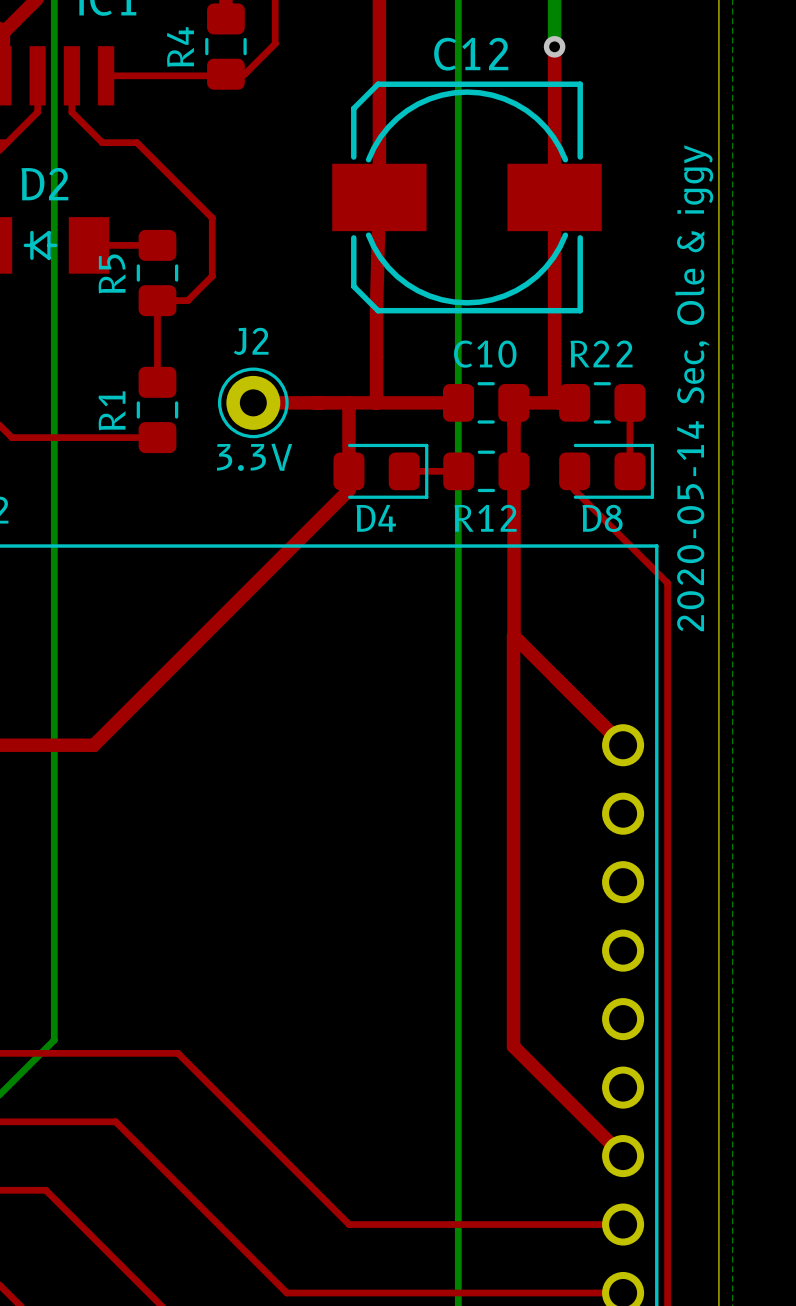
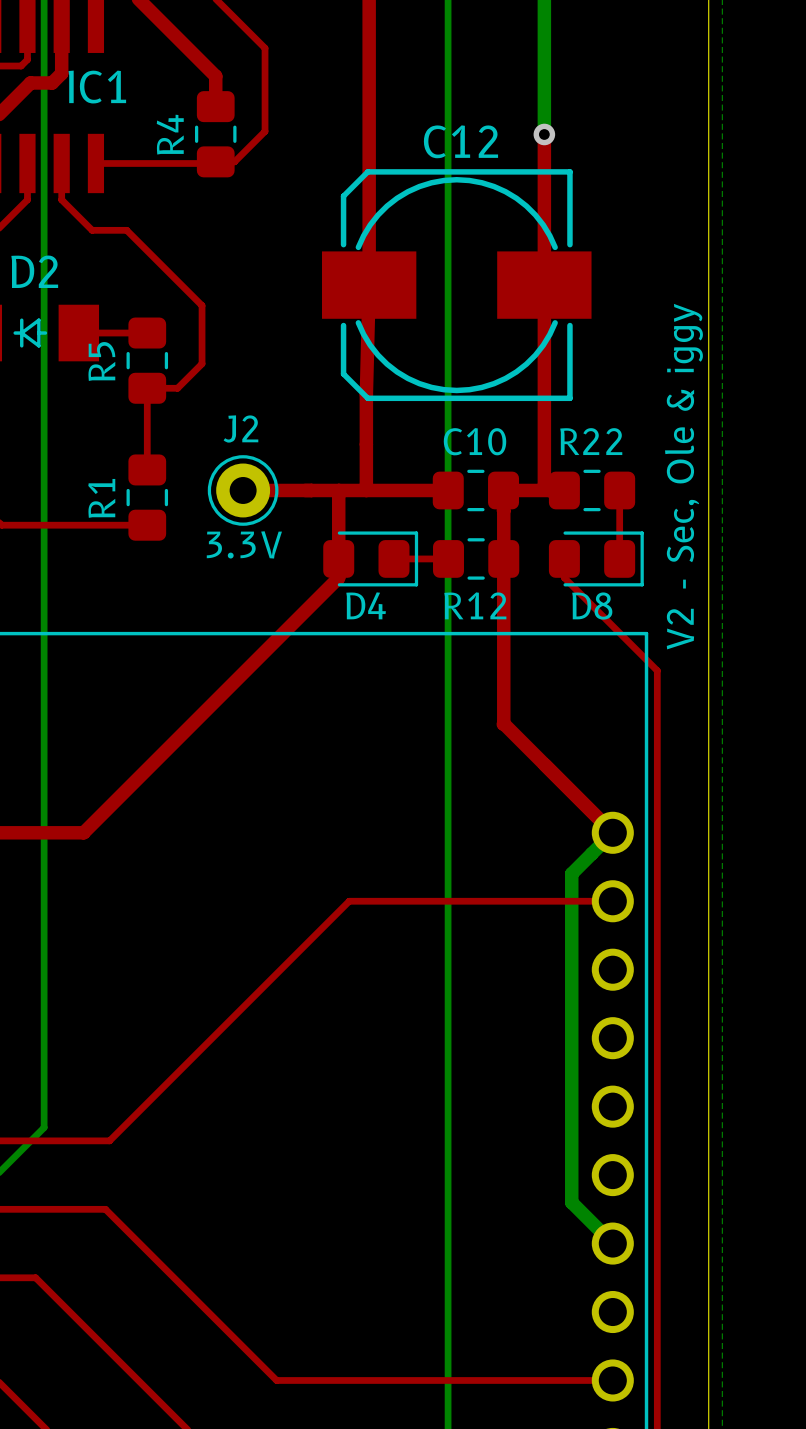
text: 2020-05-14 Sec, Ole & iggy (694, 388) -> V2 - Sec, Ole & iggy (683, 476)
top track: (513, 636) (513, 1046) (623, 1156) -> none
bottom track: none -> (612, 832) (571, 873) (571, 1202) (612, 1243)
top track: (119, 1053) (178, 1053) (349, 1224) (626, 1224) -> (109, 1140) (349, 901) (612, 901)

